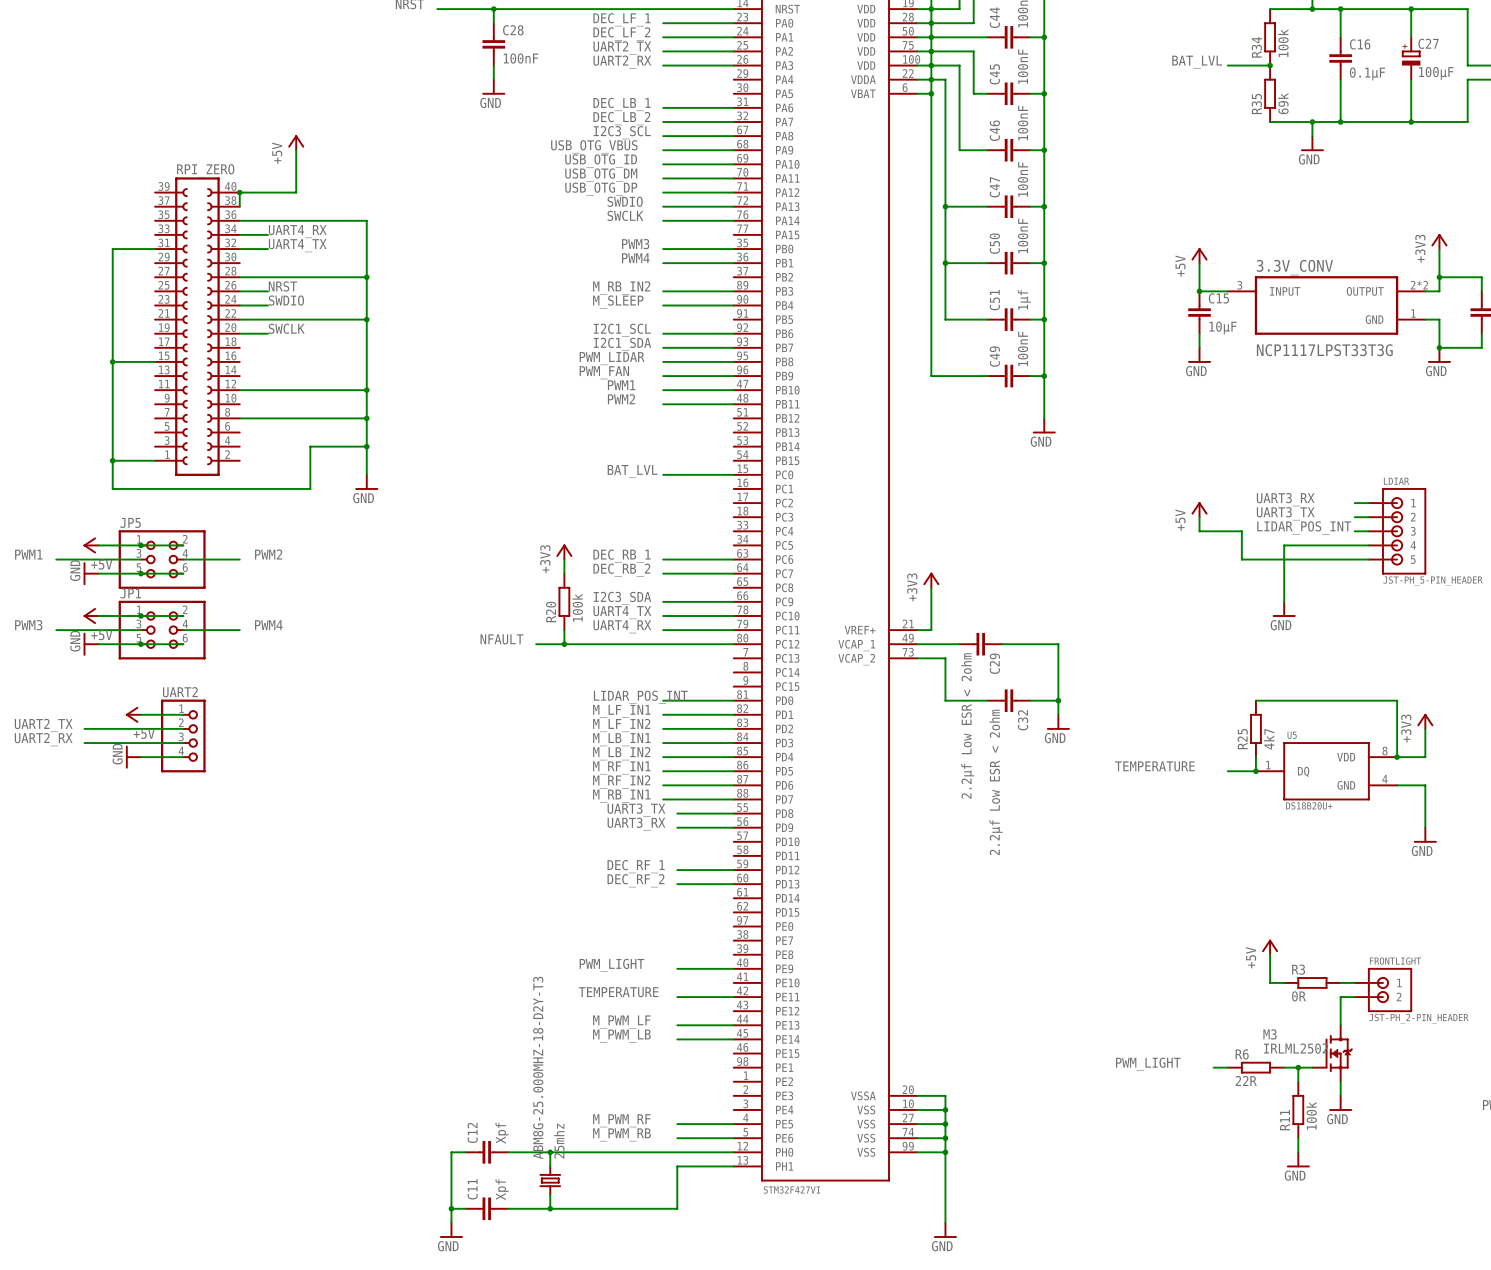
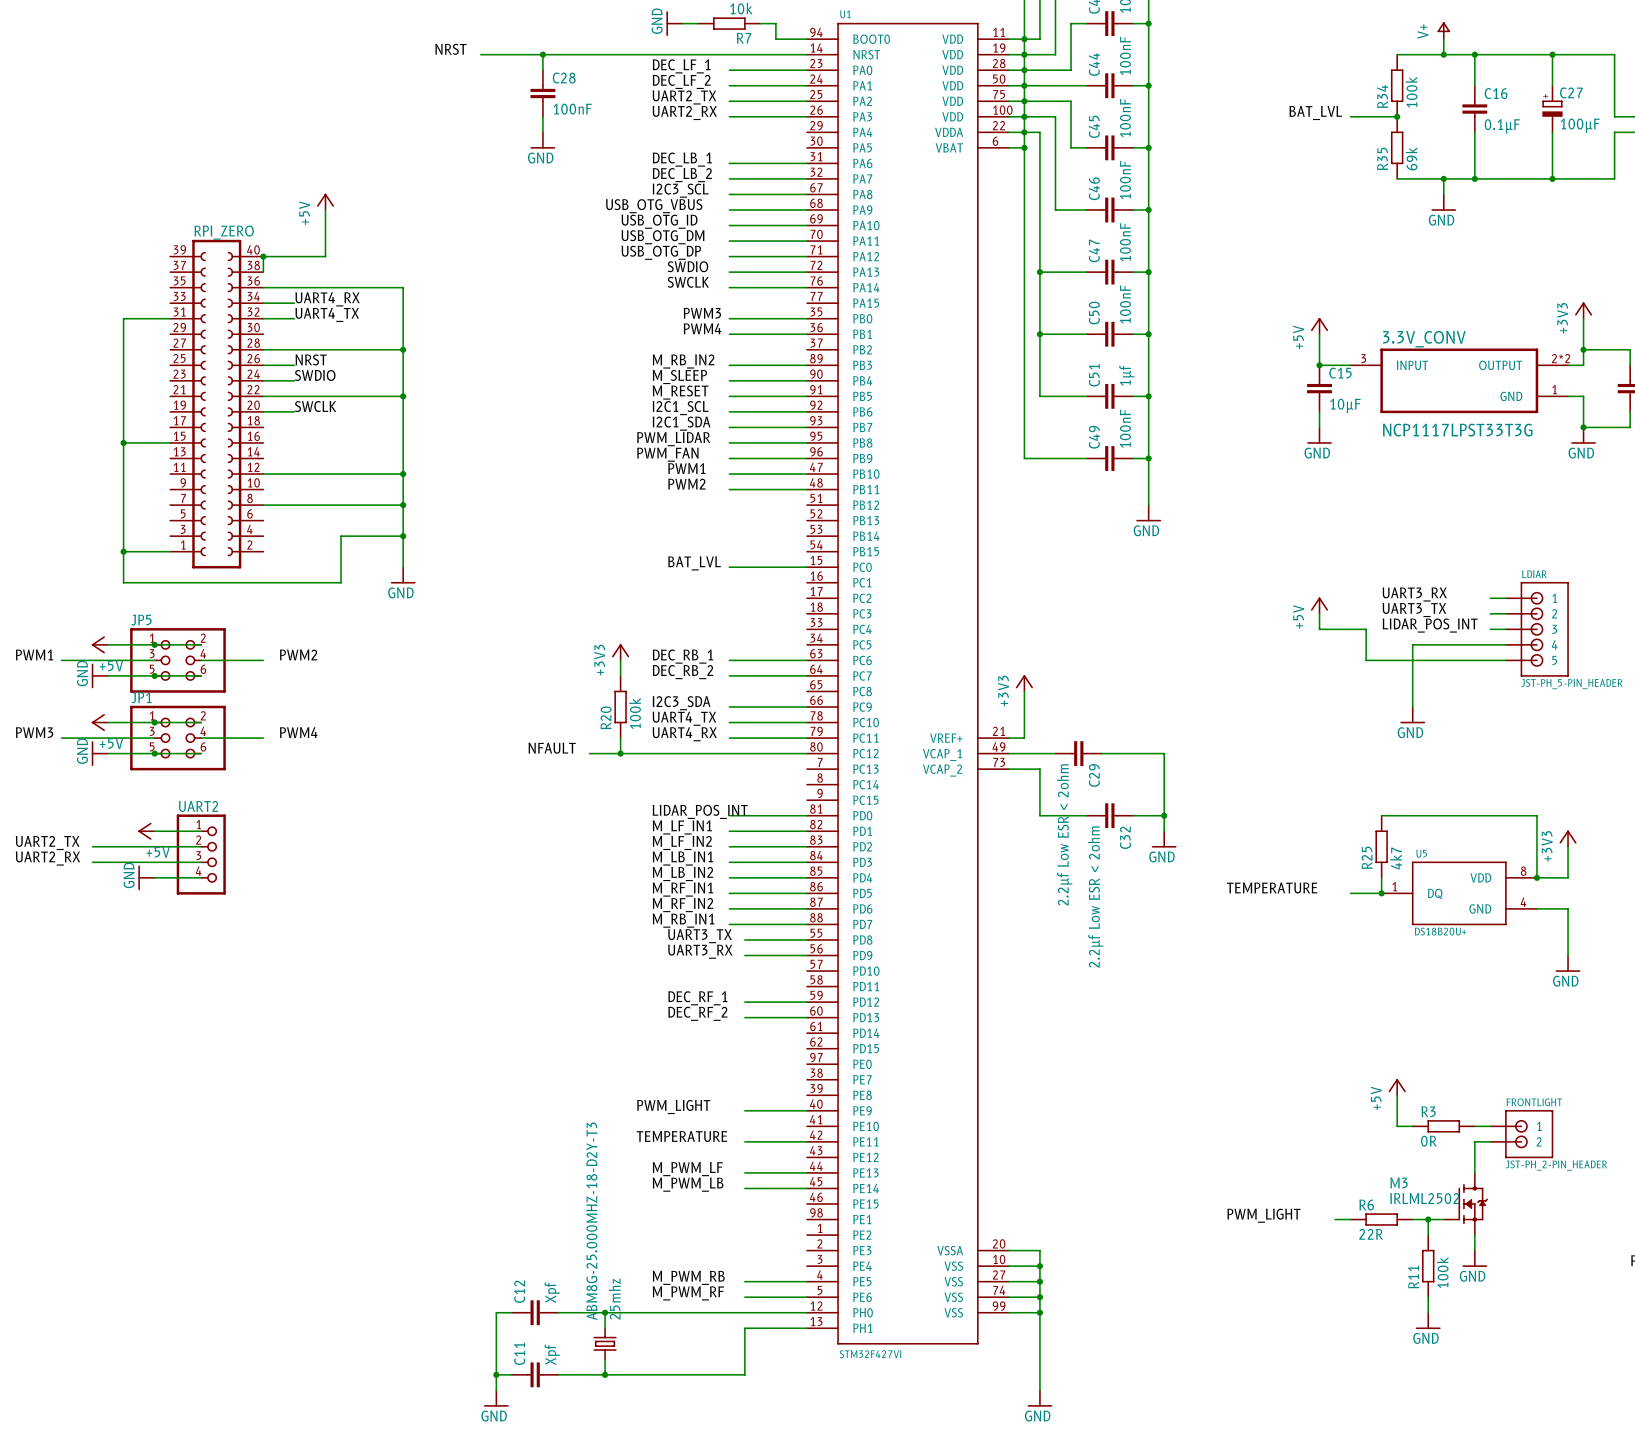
label: none -> M_RESET (680, 392)
wire: none -> (729, 396) (806, 396)
label: M_PWM_RF (621, 1120) -> M_PWM_RB (688, 1277)
label: M_PWM_RB (621, 1134) -> M_PWM_RF (688, 1293)

